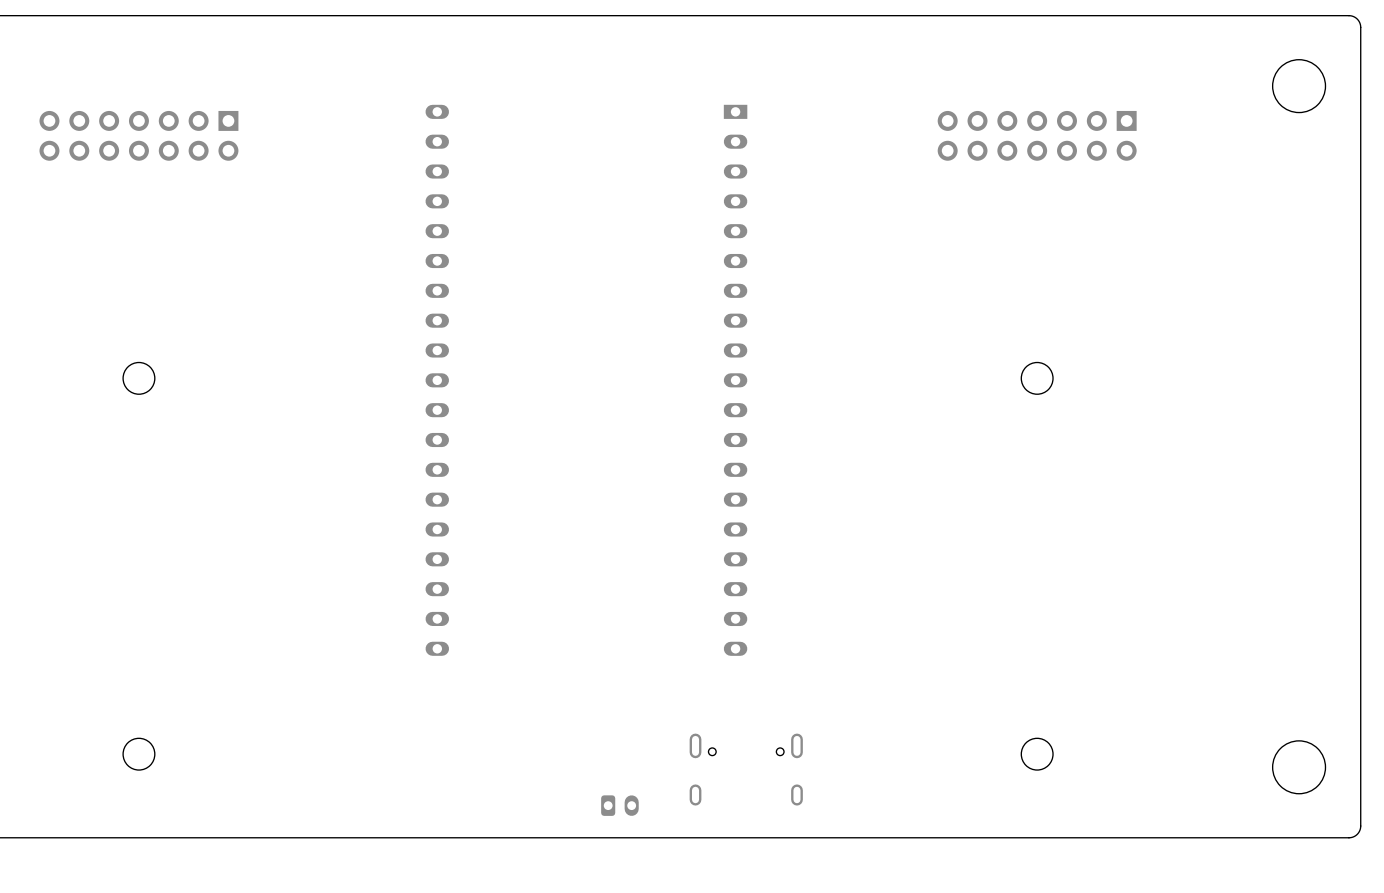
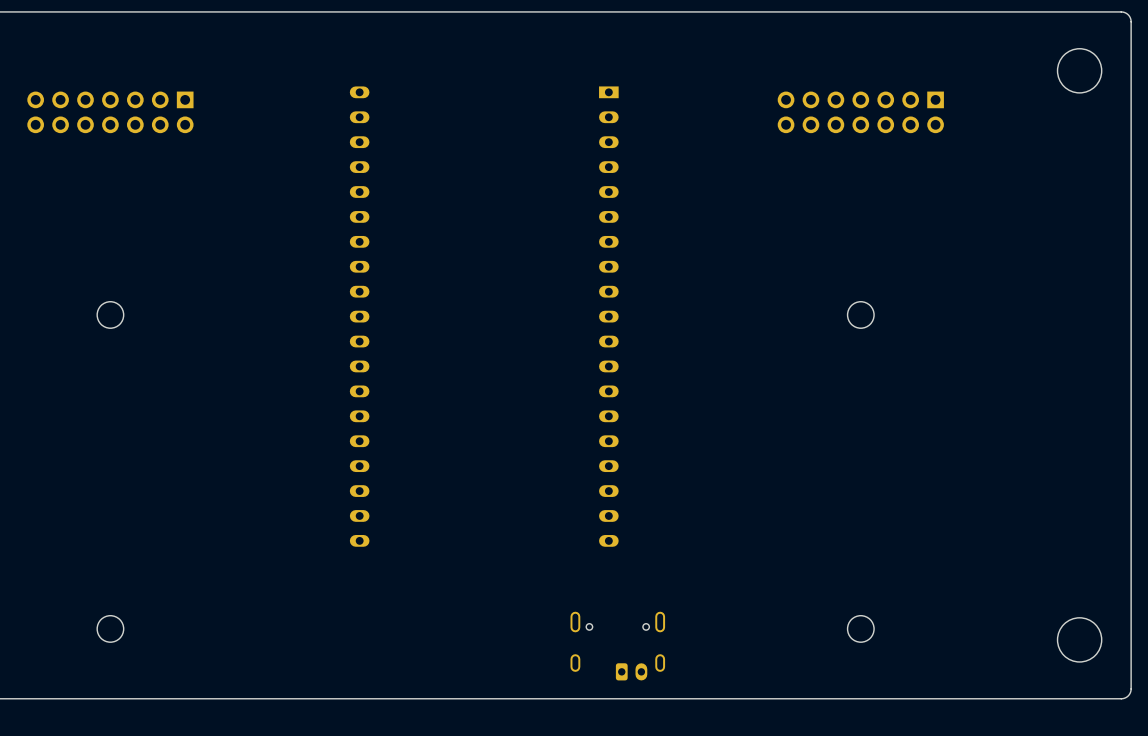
part position: (619, 805) -> (631, 671)

